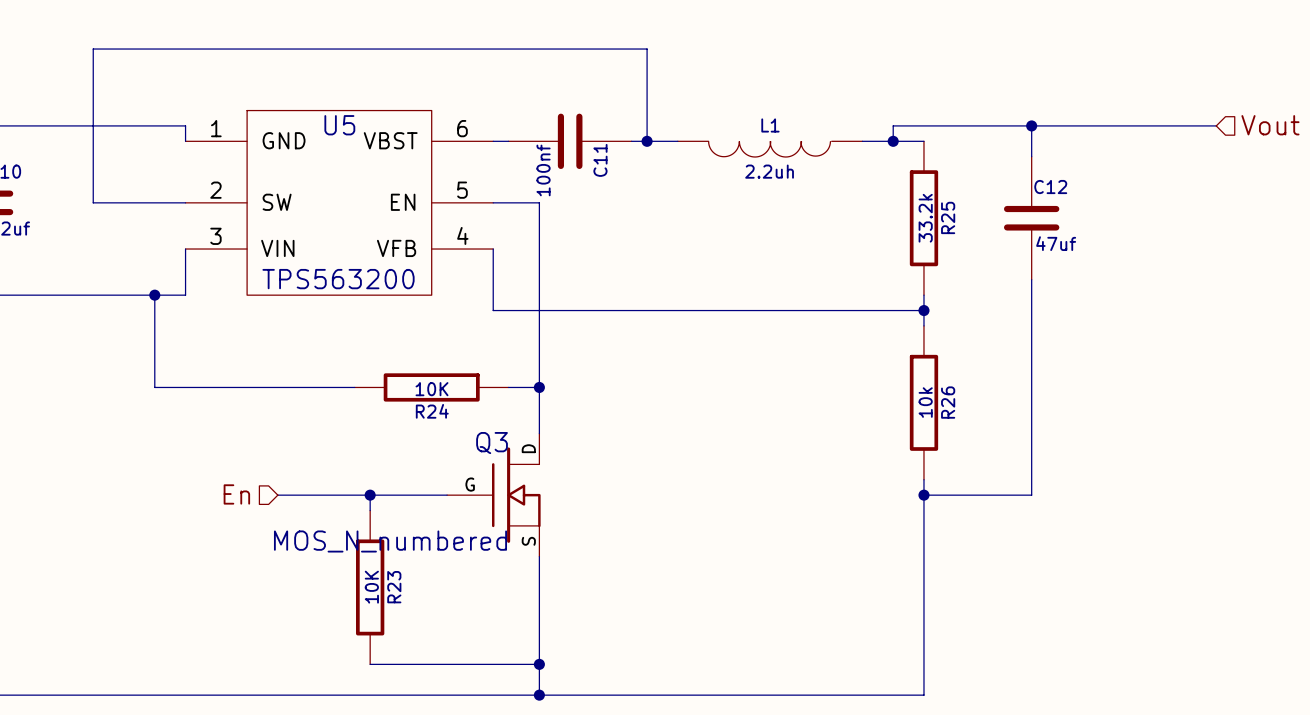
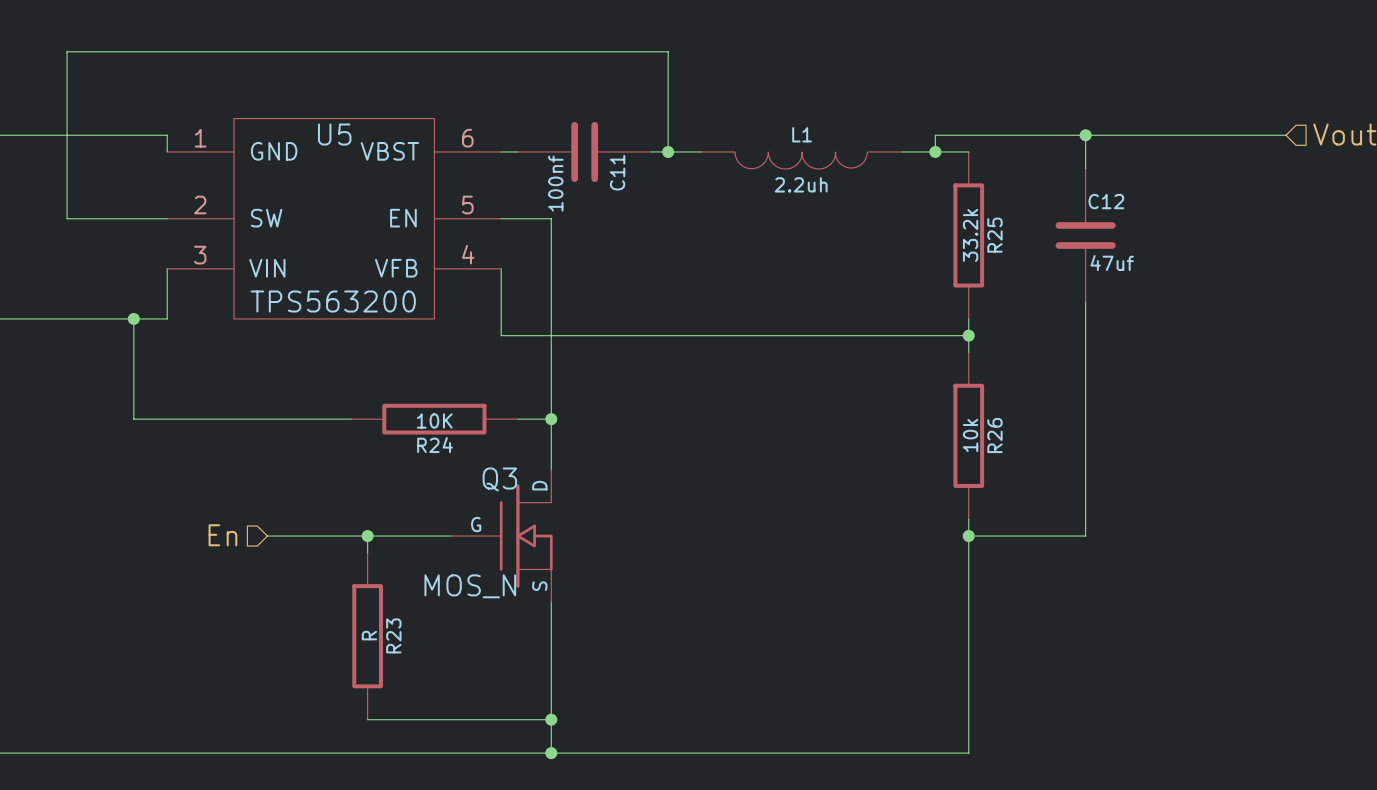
Q3 value: MOS_N_numbered (390, 541) -> MOS_N (470, 586)
R23 value: 10K (371, 587) -> R (369, 635)

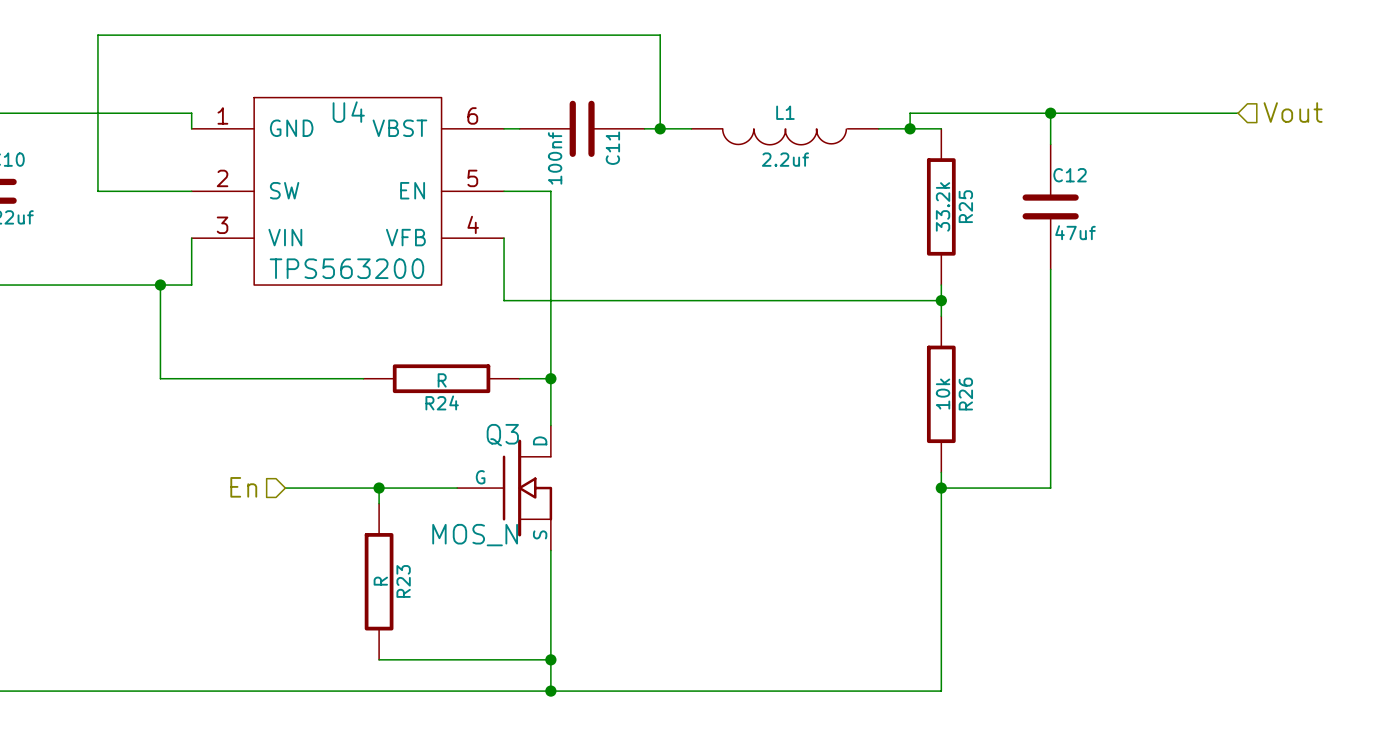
U5 name: U5 (334, 134) -> U4 (348, 112)
L1 value: 2.2uh (801, 184) -> 2.2uf (785, 159)
R24 value: 10K (434, 420) -> R (442, 380)

